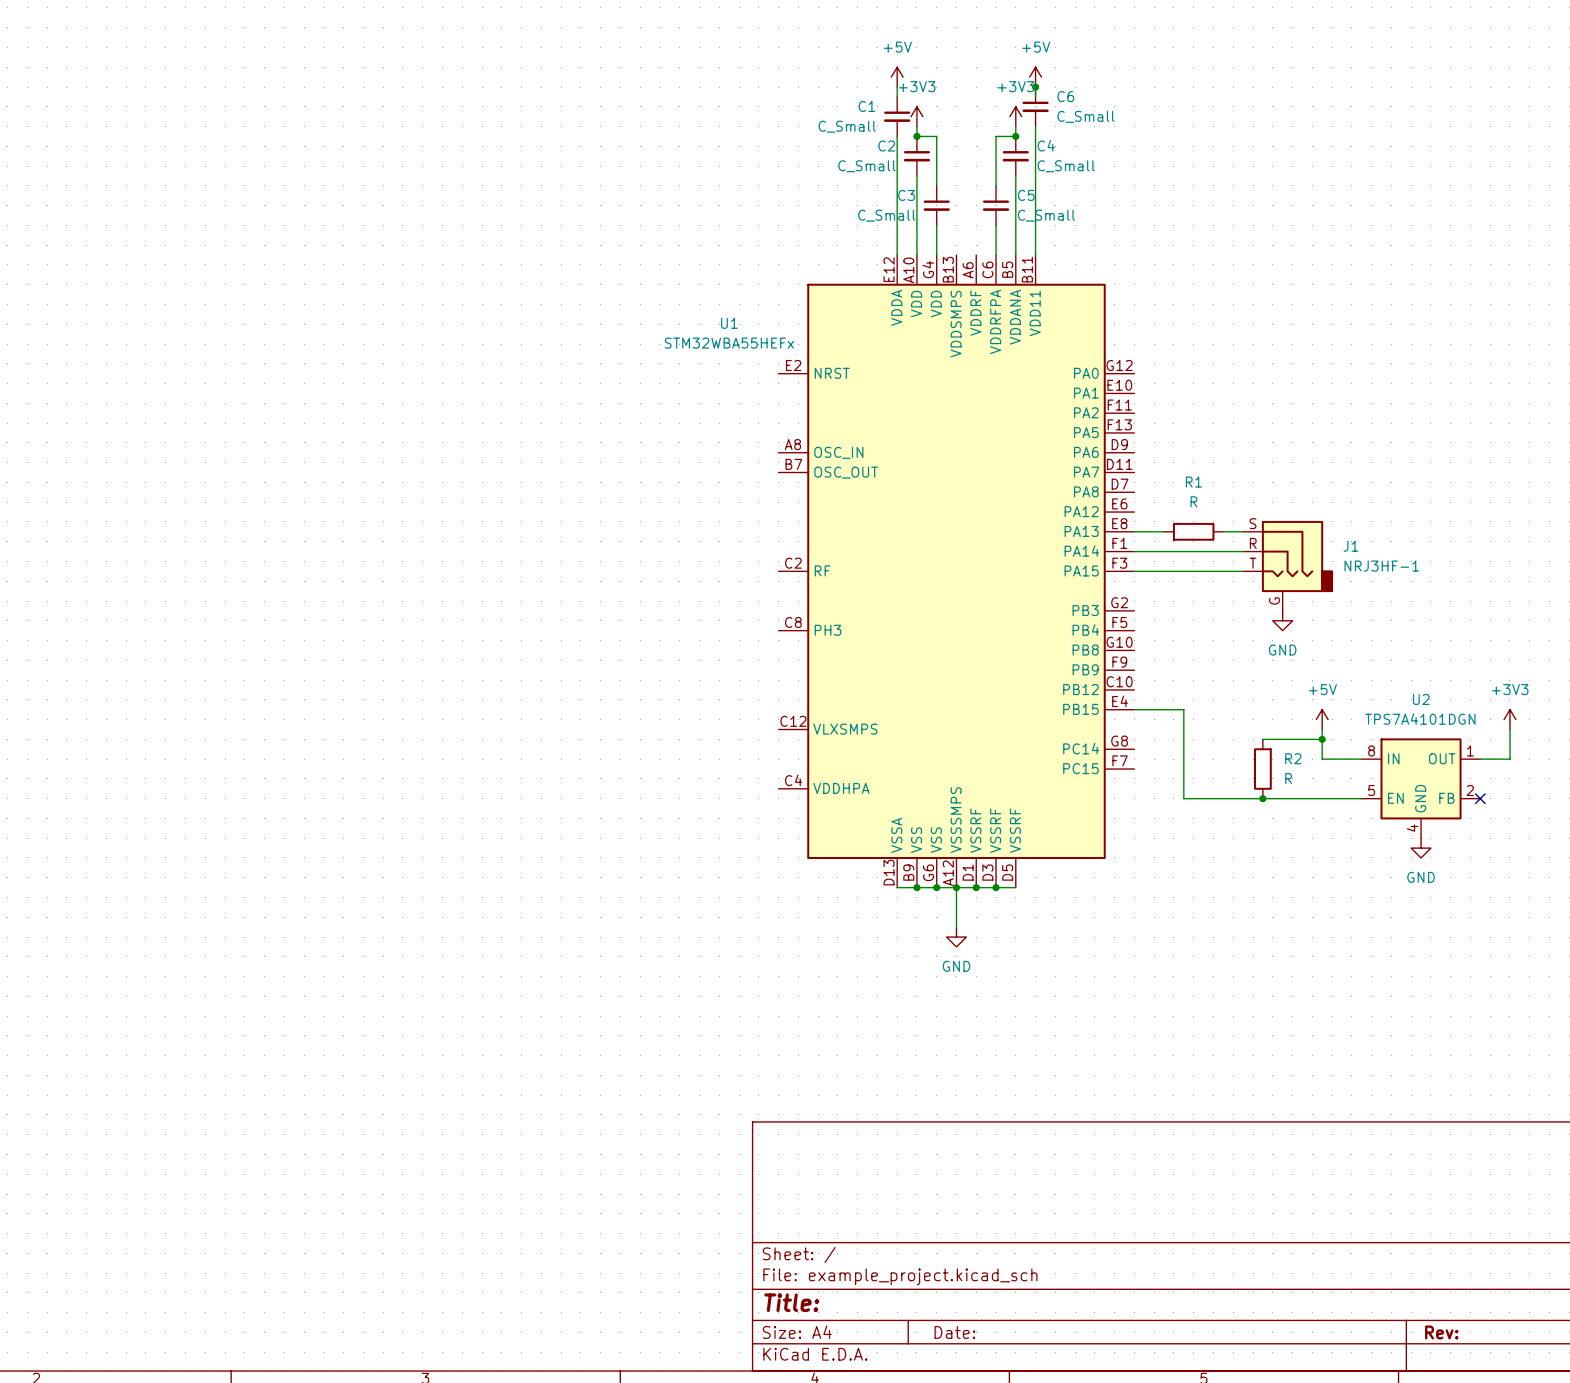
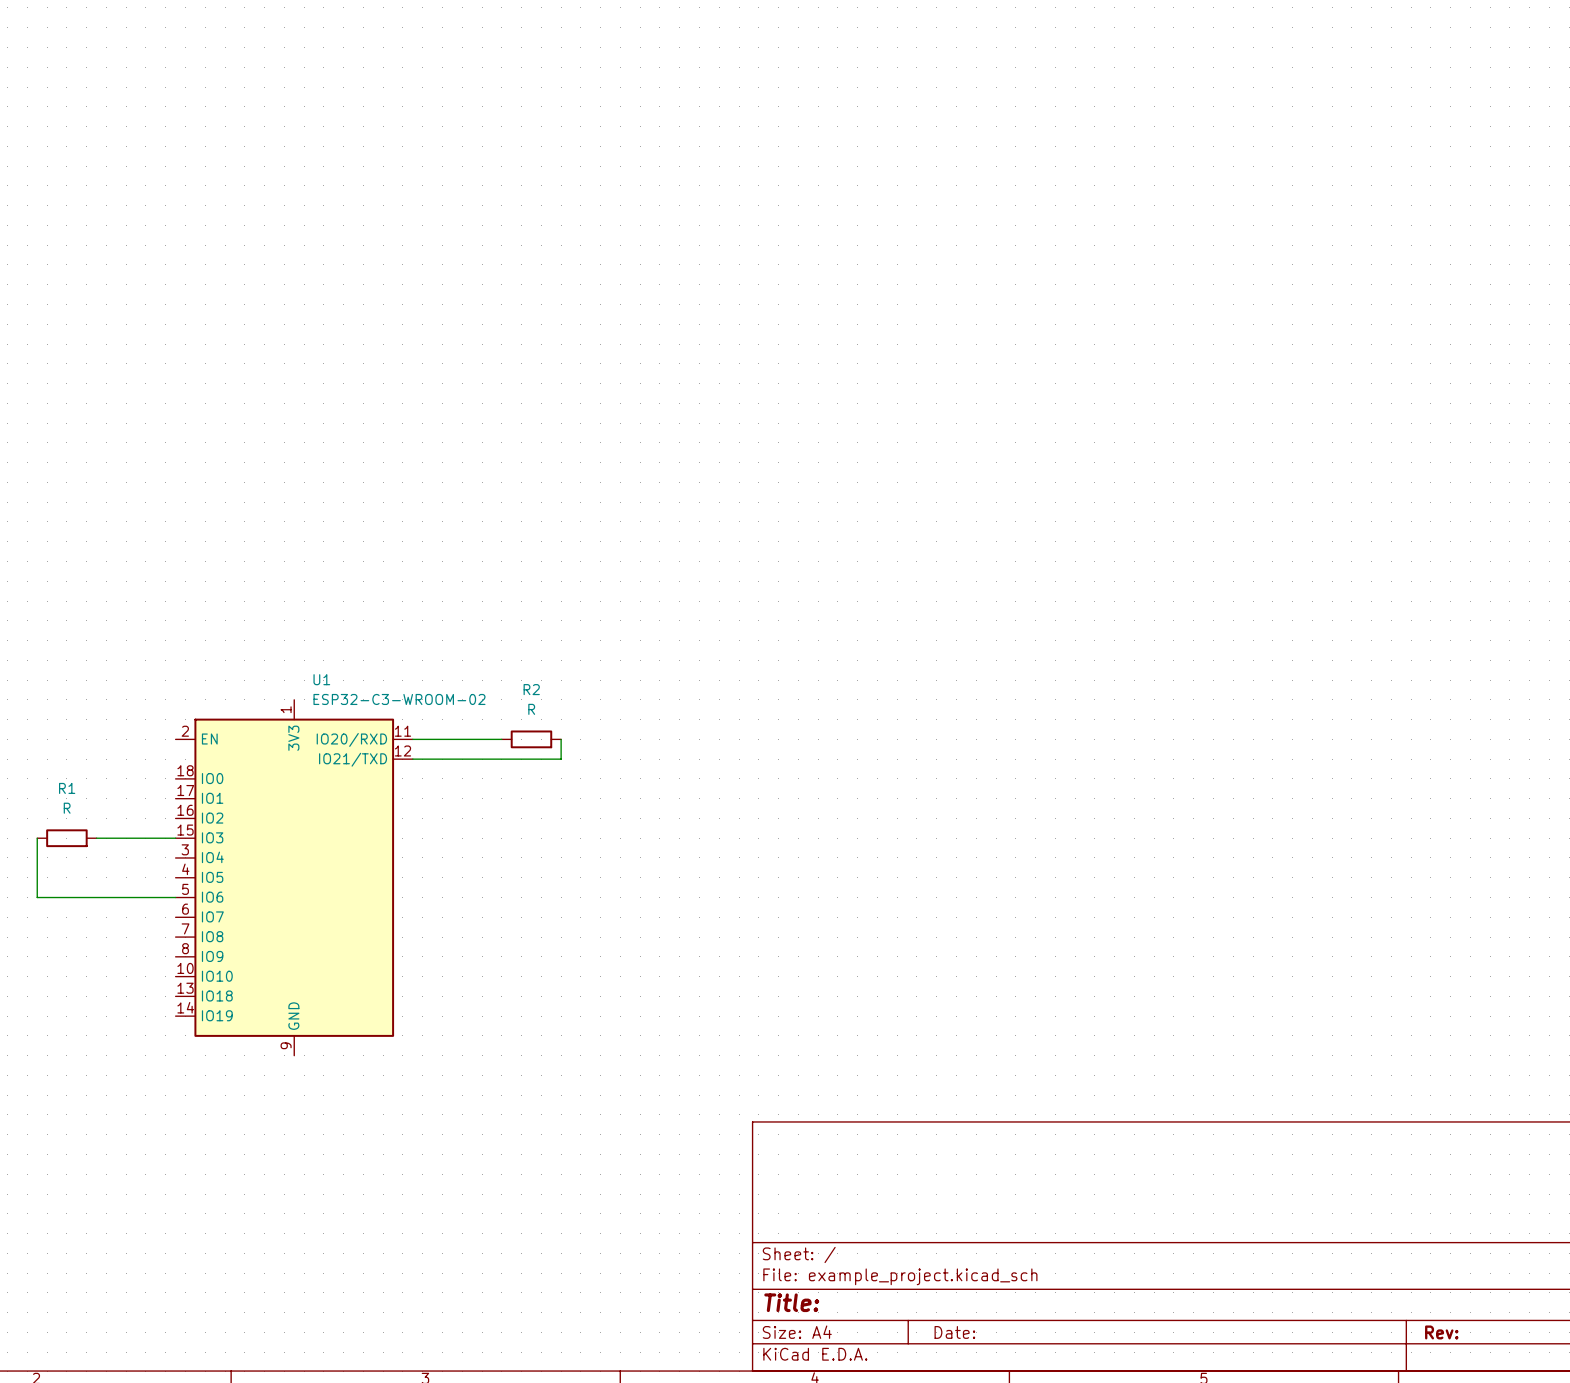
power symbol: +5V (897, 77) -> none
power symbol: +5V (1035, 77) -> none
wire: (897, 87) (897, 96) -> none
wire: (1035, 87) (1035, 96) -> none
junction: (1035, 87) -> none
C6: C_Small (1035, 106) -> none
C1: C_Small (897, 116) -> none
power symbol: +3V3 (916, 116) -> none
power symbol: +3V3 (1015, 116) -> none
wire: (916, 126) (916, 136) (936, 136) (936, 185) -> none
wire: (1015, 126) (1015, 136) (996, 136) (996, 185) -> none
wire: (1035, 126) (1035, 255) -> none
wire: (897, 136) (897, 255) -> none
junction: (916, 136) -> none
junction: (1015, 136) -> none
C2: C_Small (916, 156) -> none
C4: C_Small (1015, 156) -> none
wire: (916, 175) (916, 255) -> none
wire: (1015, 175) (1015, 255) -> none
C3: C_Small (936, 205) -> none
C5: C_Small (996, 205) -> none
wire: (936, 225) (936, 255) -> none
wire: (996, 225) (996, 255) -> none
U1 symbol: [778, 255, 1135, 888] -> [175, 699, 413, 1056]
U1 name position: U1 (729, 323) -> U1 (321, 679)
U1 value: STM32WBA55HEFx (729, 343) -> ESP32-C3-WROOM-02 (399, 699)
wire: (1134, 531) (1164, 531) -> none
R1 position: (1193, 531) -> (66, 838)
wire: (1223, 531) (1243, 531) -> none
wire: (1134, 551) (1243, 551) -> none
J1: NRJ3HF-1 (1288, 565) -> none
wire: (1134, 571) (1243, 571) -> none
power symbol: GND (1282, 620) -> none
wire: (1134, 709) (1183, 709) (1183, 798) (1361, 798) -> none
power symbol: +5V (1322, 719) -> none
power symbol: +3V3 (1509, 719) -> none
wire: (1322, 729) (1322, 759) (1361, 759) -> none
wire: (1509, 729) (1509, 759) (1480, 759) -> none
wire: none -> (412, 739) (501, 739)
wire: none -> (561, 739) (561, 759) (412, 759)
wire: (1262, 739) (1322, 739) -> none
junction: (1322, 739) -> none
R2 name position: R2 (1293, 758) -> R2 (531, 689)
R2 rotation: 0° (1262, 769) -> 90° clockwise (531, 739)
R2 position: (1262, 769) -> (531, 739)
R2 value position: R (1288, 778) -> R (531, 709)
U2: TPS7A4101DGN (1421, 788) -> none
junction: (1262, 798) -> none
no-connect mark: (1480, 798) -> none
wire: none -> (37, 838) (37, 897) (175, 897)
wire: none -> (96, 838) (175, 838)
power symbol: GND (1421, 848) -> none
wire: (897, 887) (1015, 887) -> none
junction: (916, 887) -> none
junction: (936, 887) -> none
wire: (956, 887) (956, 927) -> none
junction: (956, 887) -> none
junction: (976, 887) -> none
junction: (996, 887) -> none
power symbol: GND (956, 937) -> none

